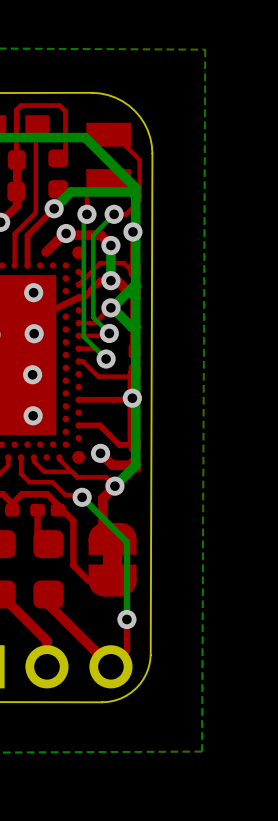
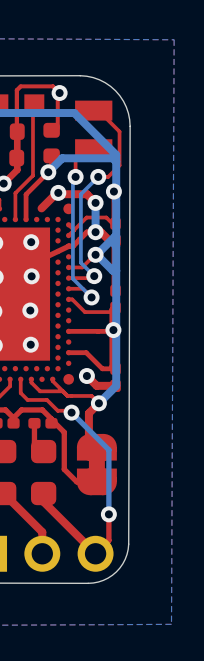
via: none -> (59, 93)

